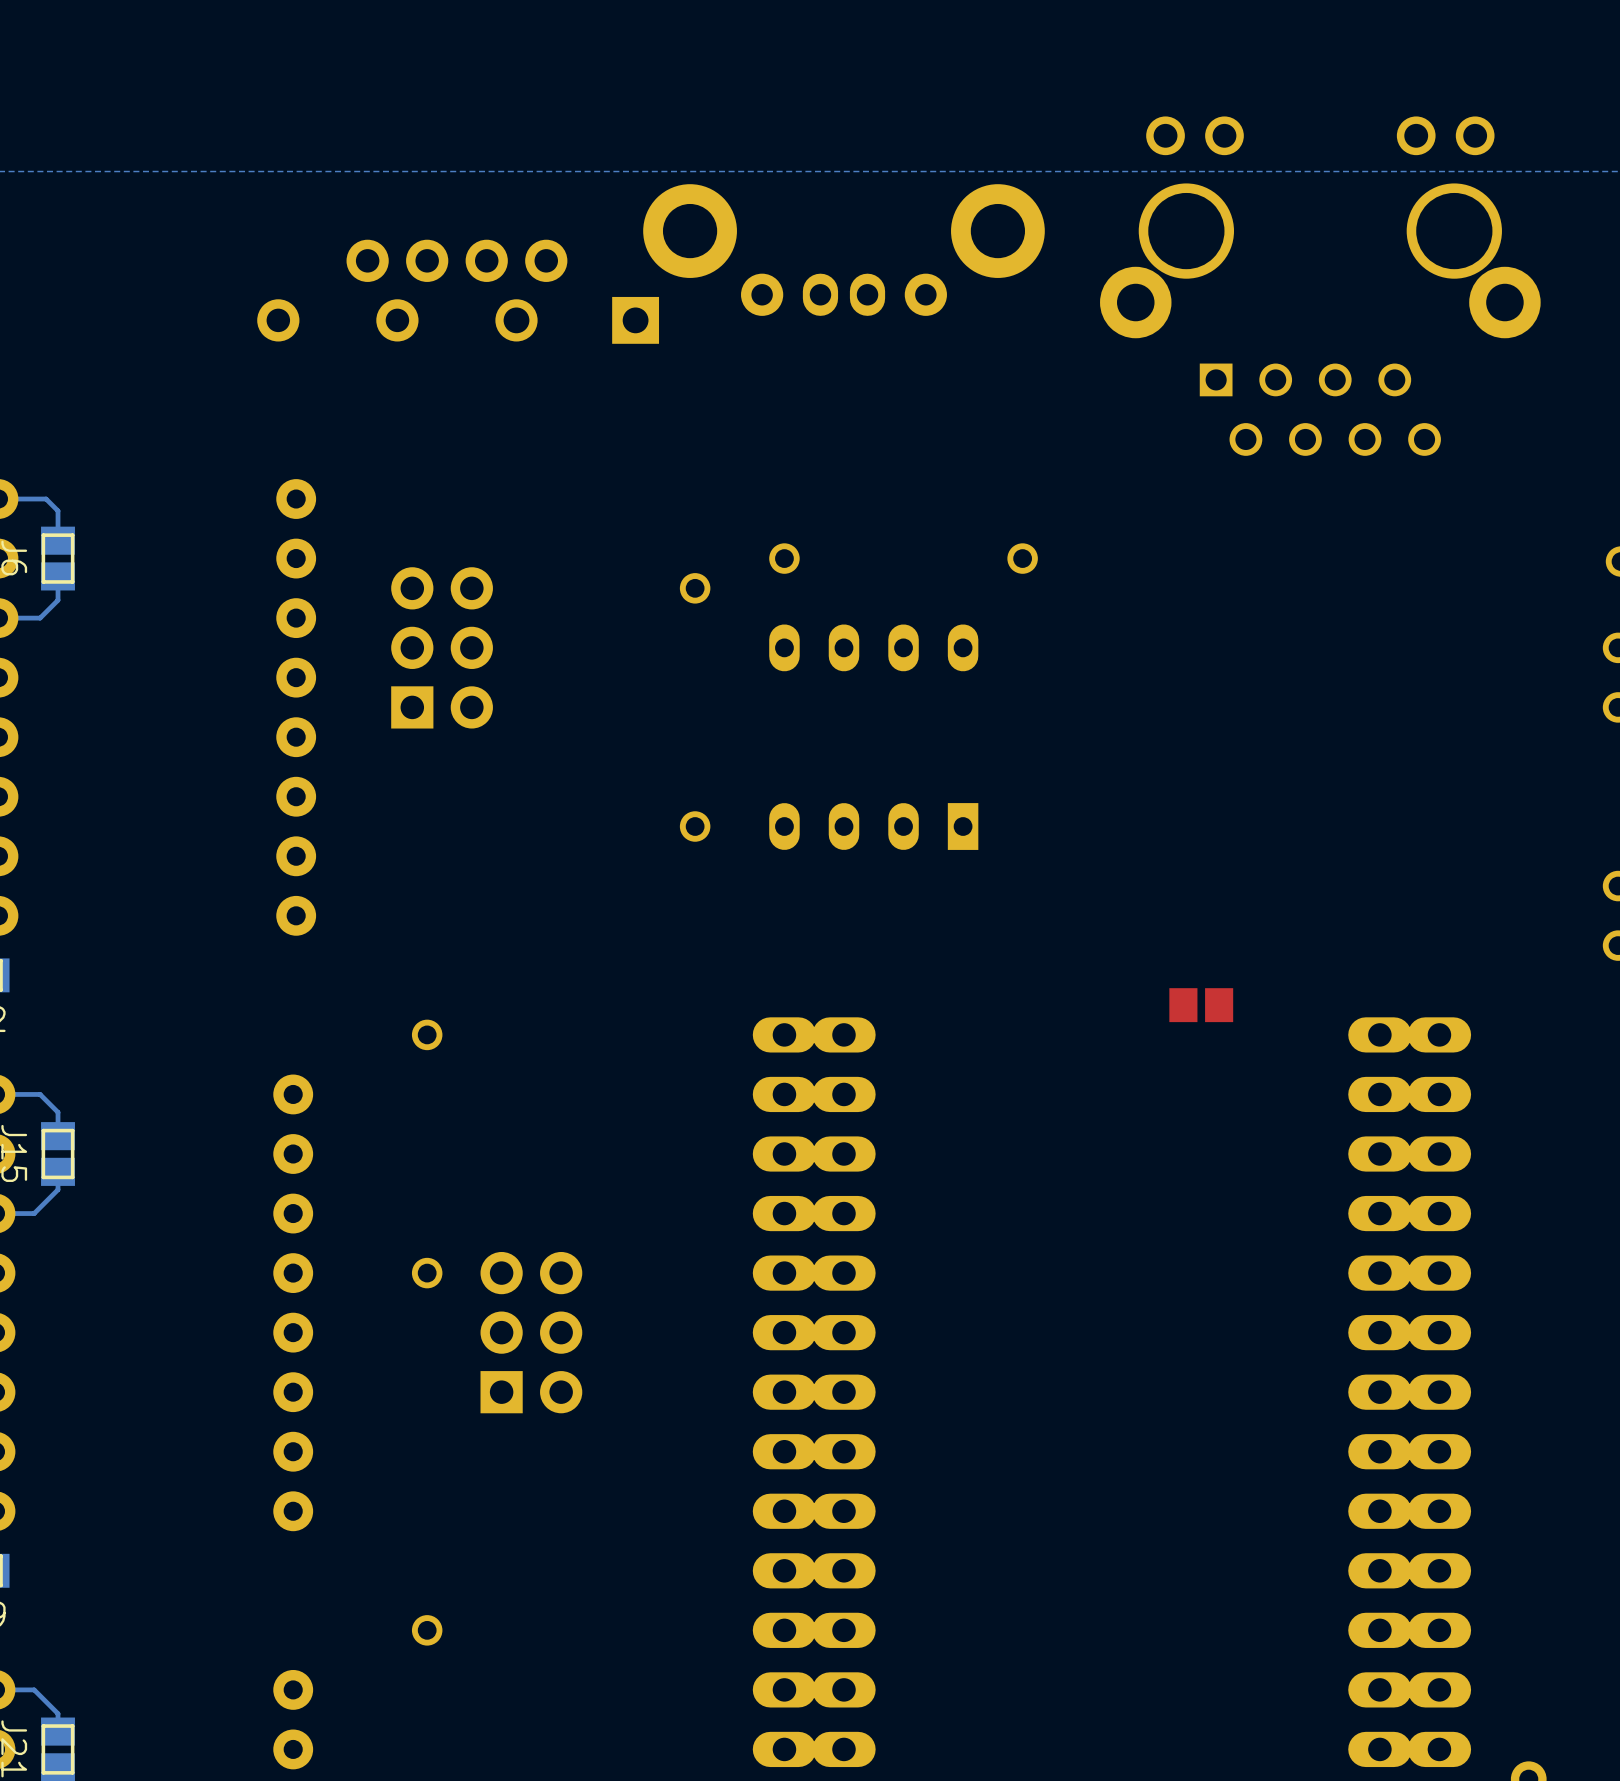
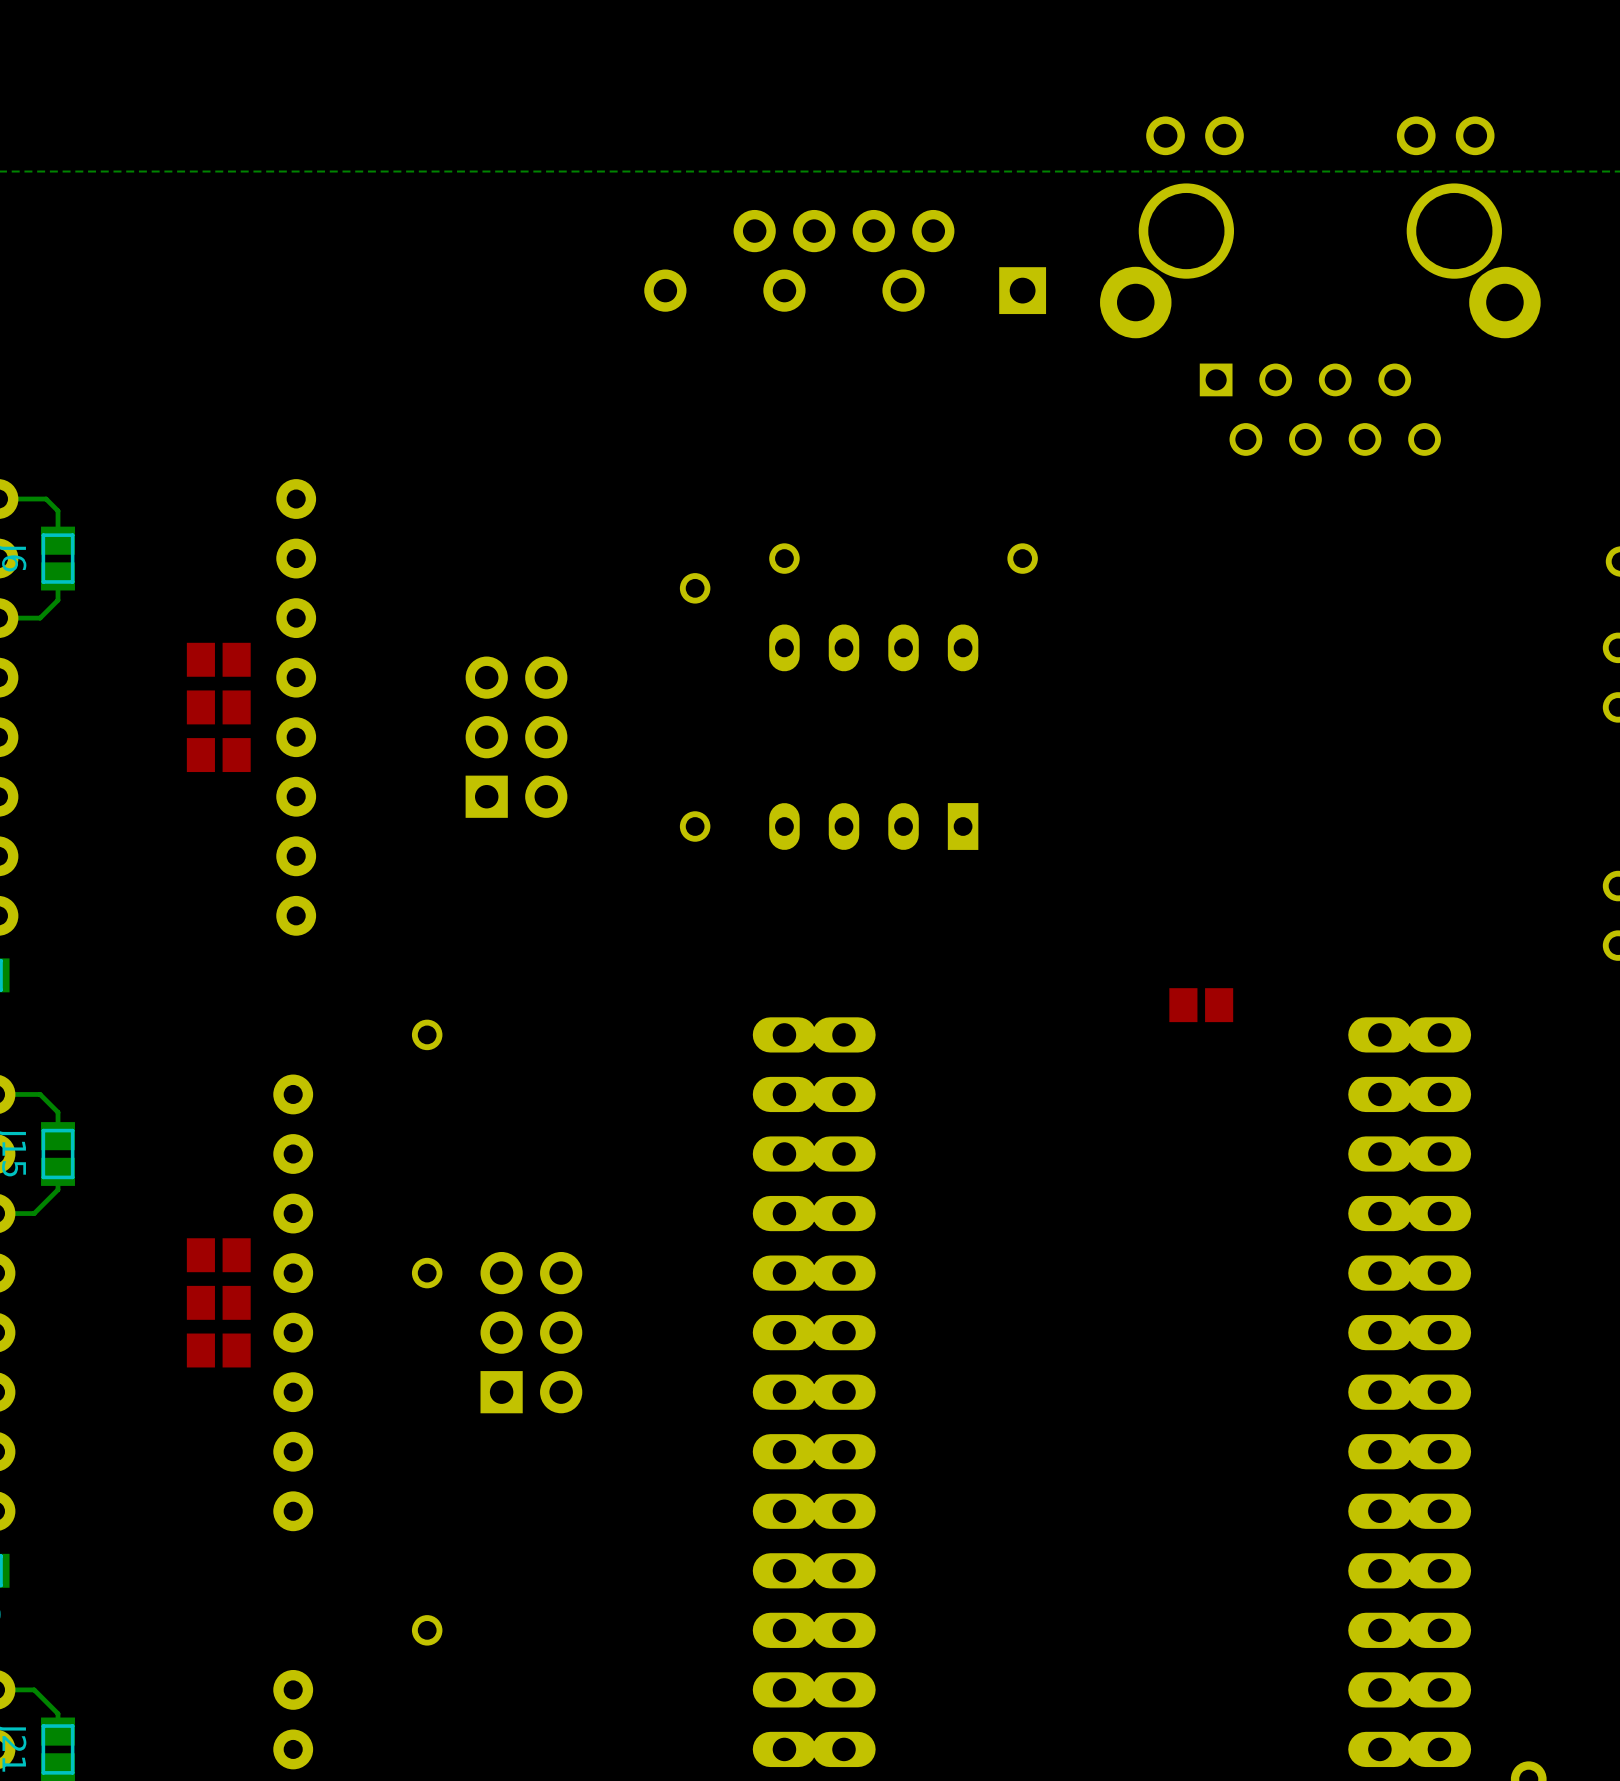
part footprint: [643, 184, 1045, 316] -> [644, 209, 1047, 315]
part: (458, 291) -> none
part position: (442, 647) -> (516, 737)
part: none -> (218, 707)
part: none -> (218, 1302)

